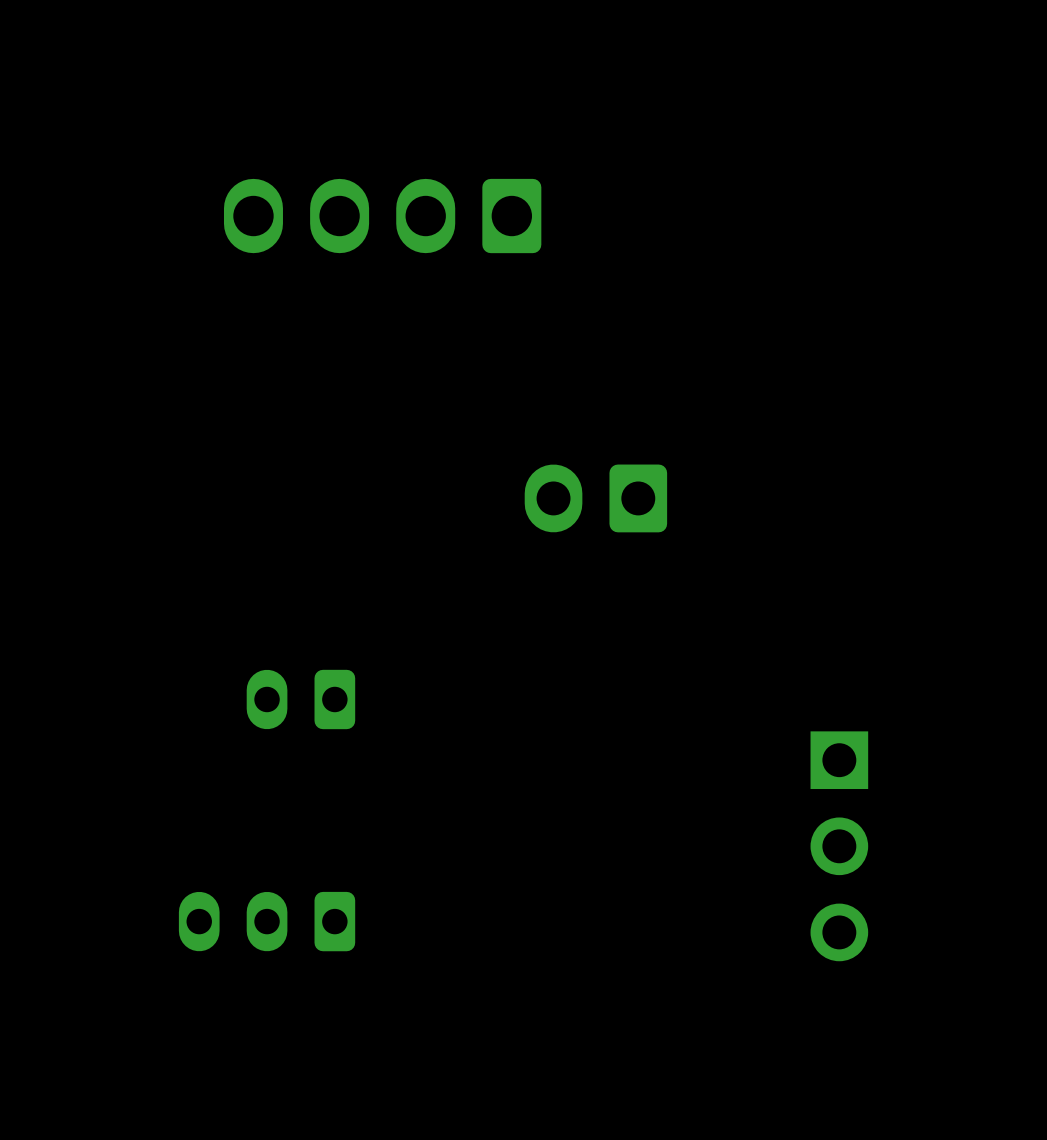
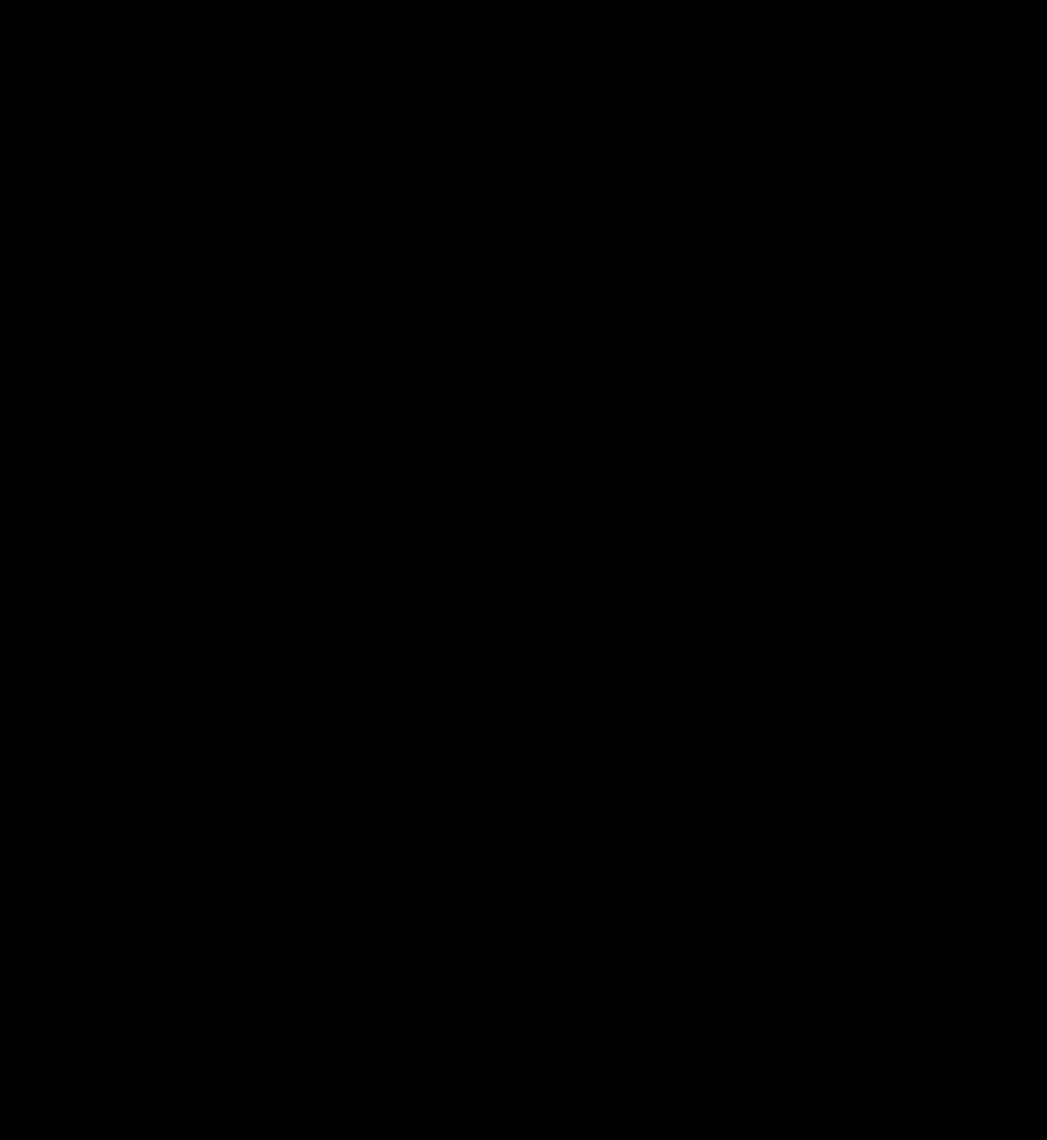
part: (382, 216) -> none
part: (595, 498) -> none
part: (300, 699) -> none
part: (839, 846) -> none
part: (267, 921) -> none

